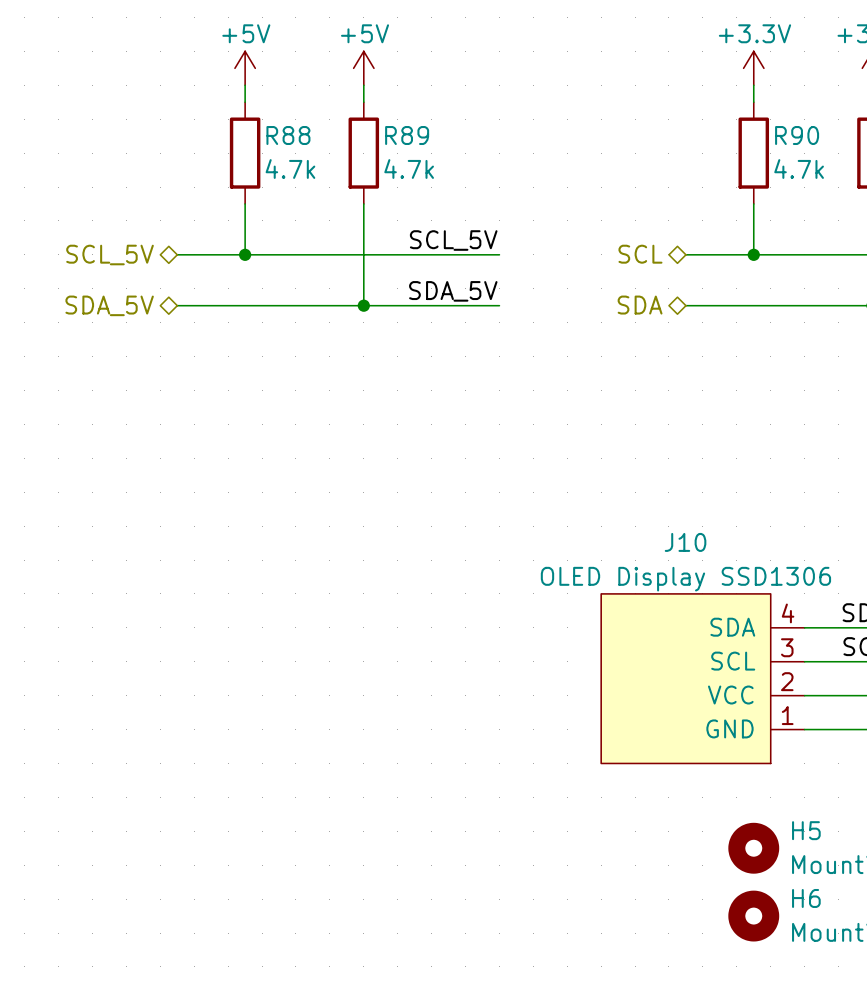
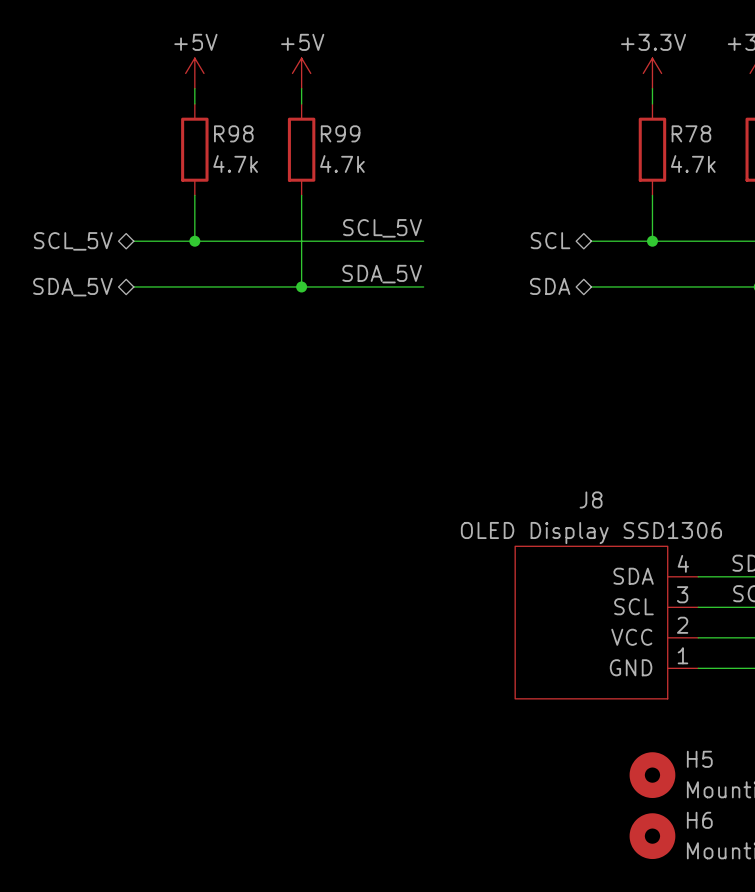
R88 name: R88 (288, 135) -> R98 (233, 133)
R89 name: R89 (407, 135) -> R99 (340, 133)
R90 name: R90 (797, 135) -> R78 (691, 133)
J10 name: J10 (685, 542) -> J8 (591, 499)

